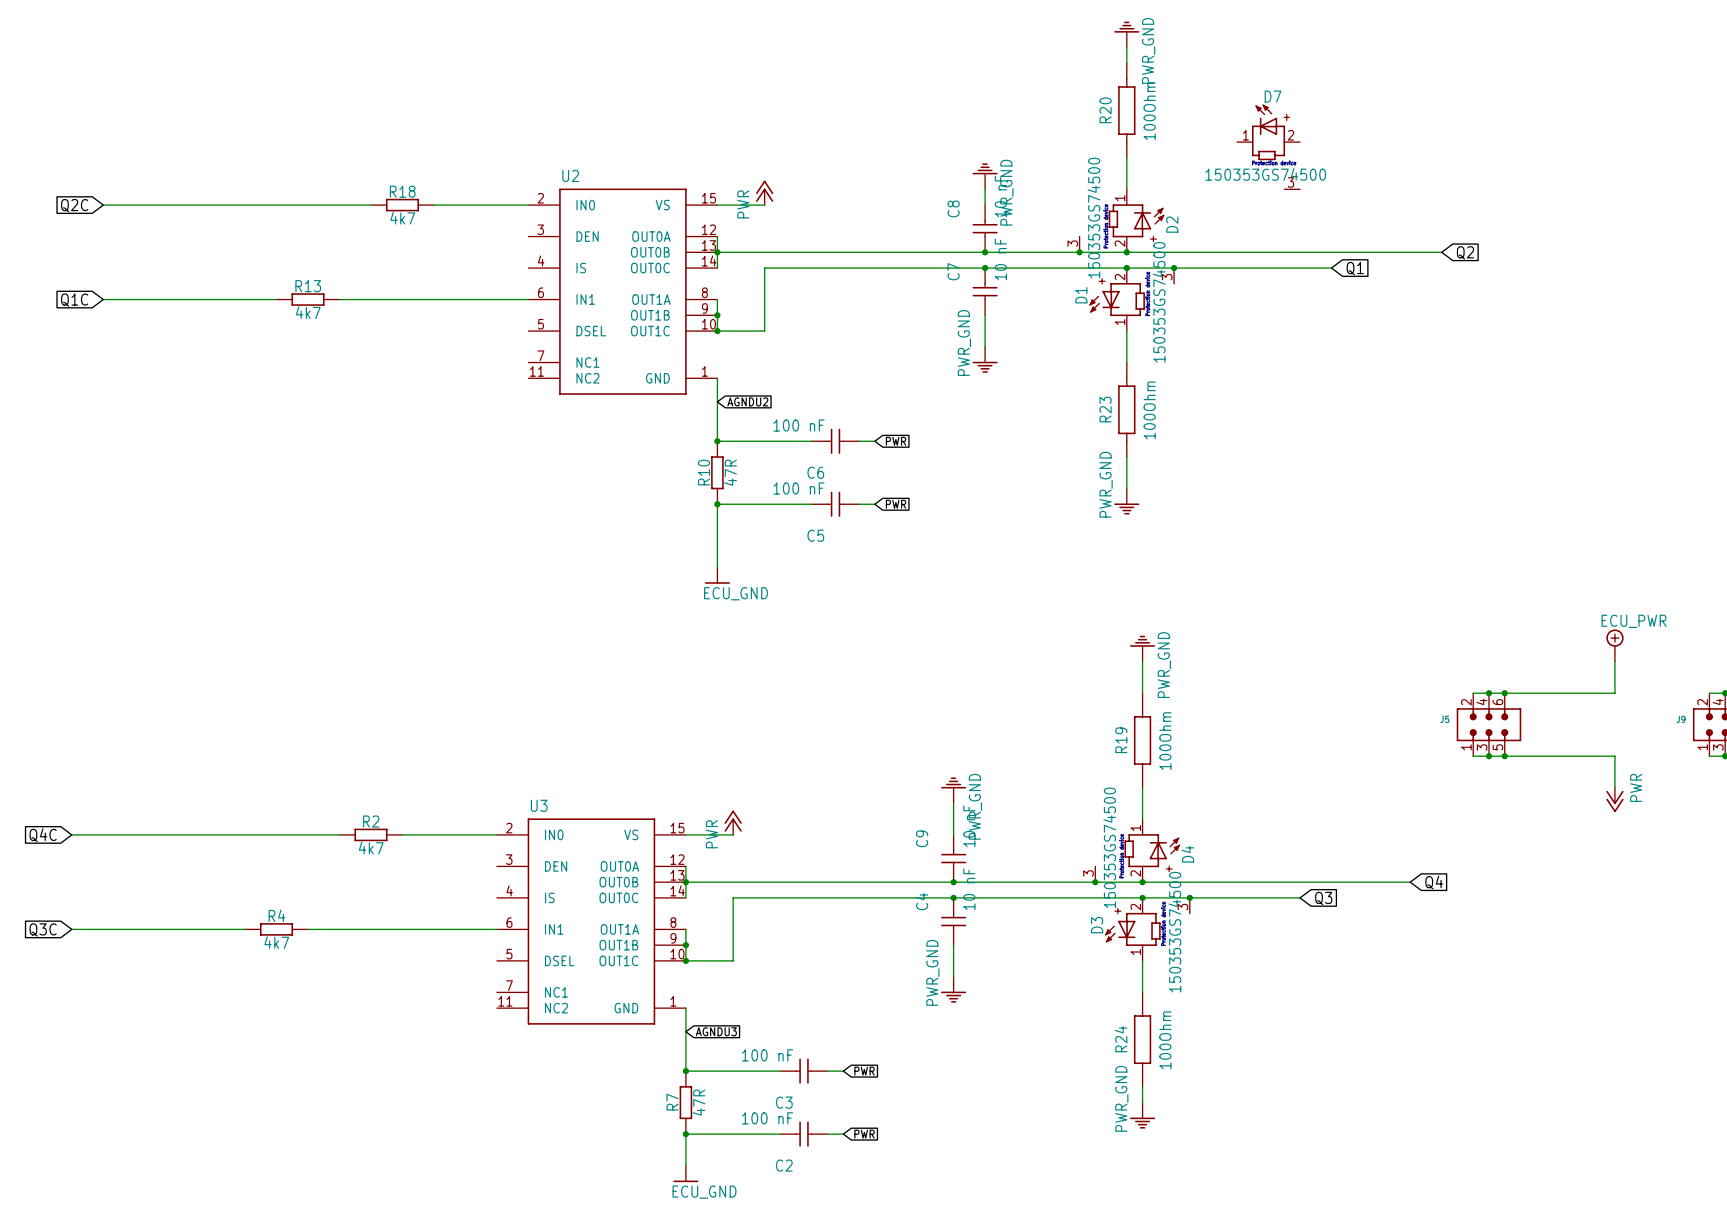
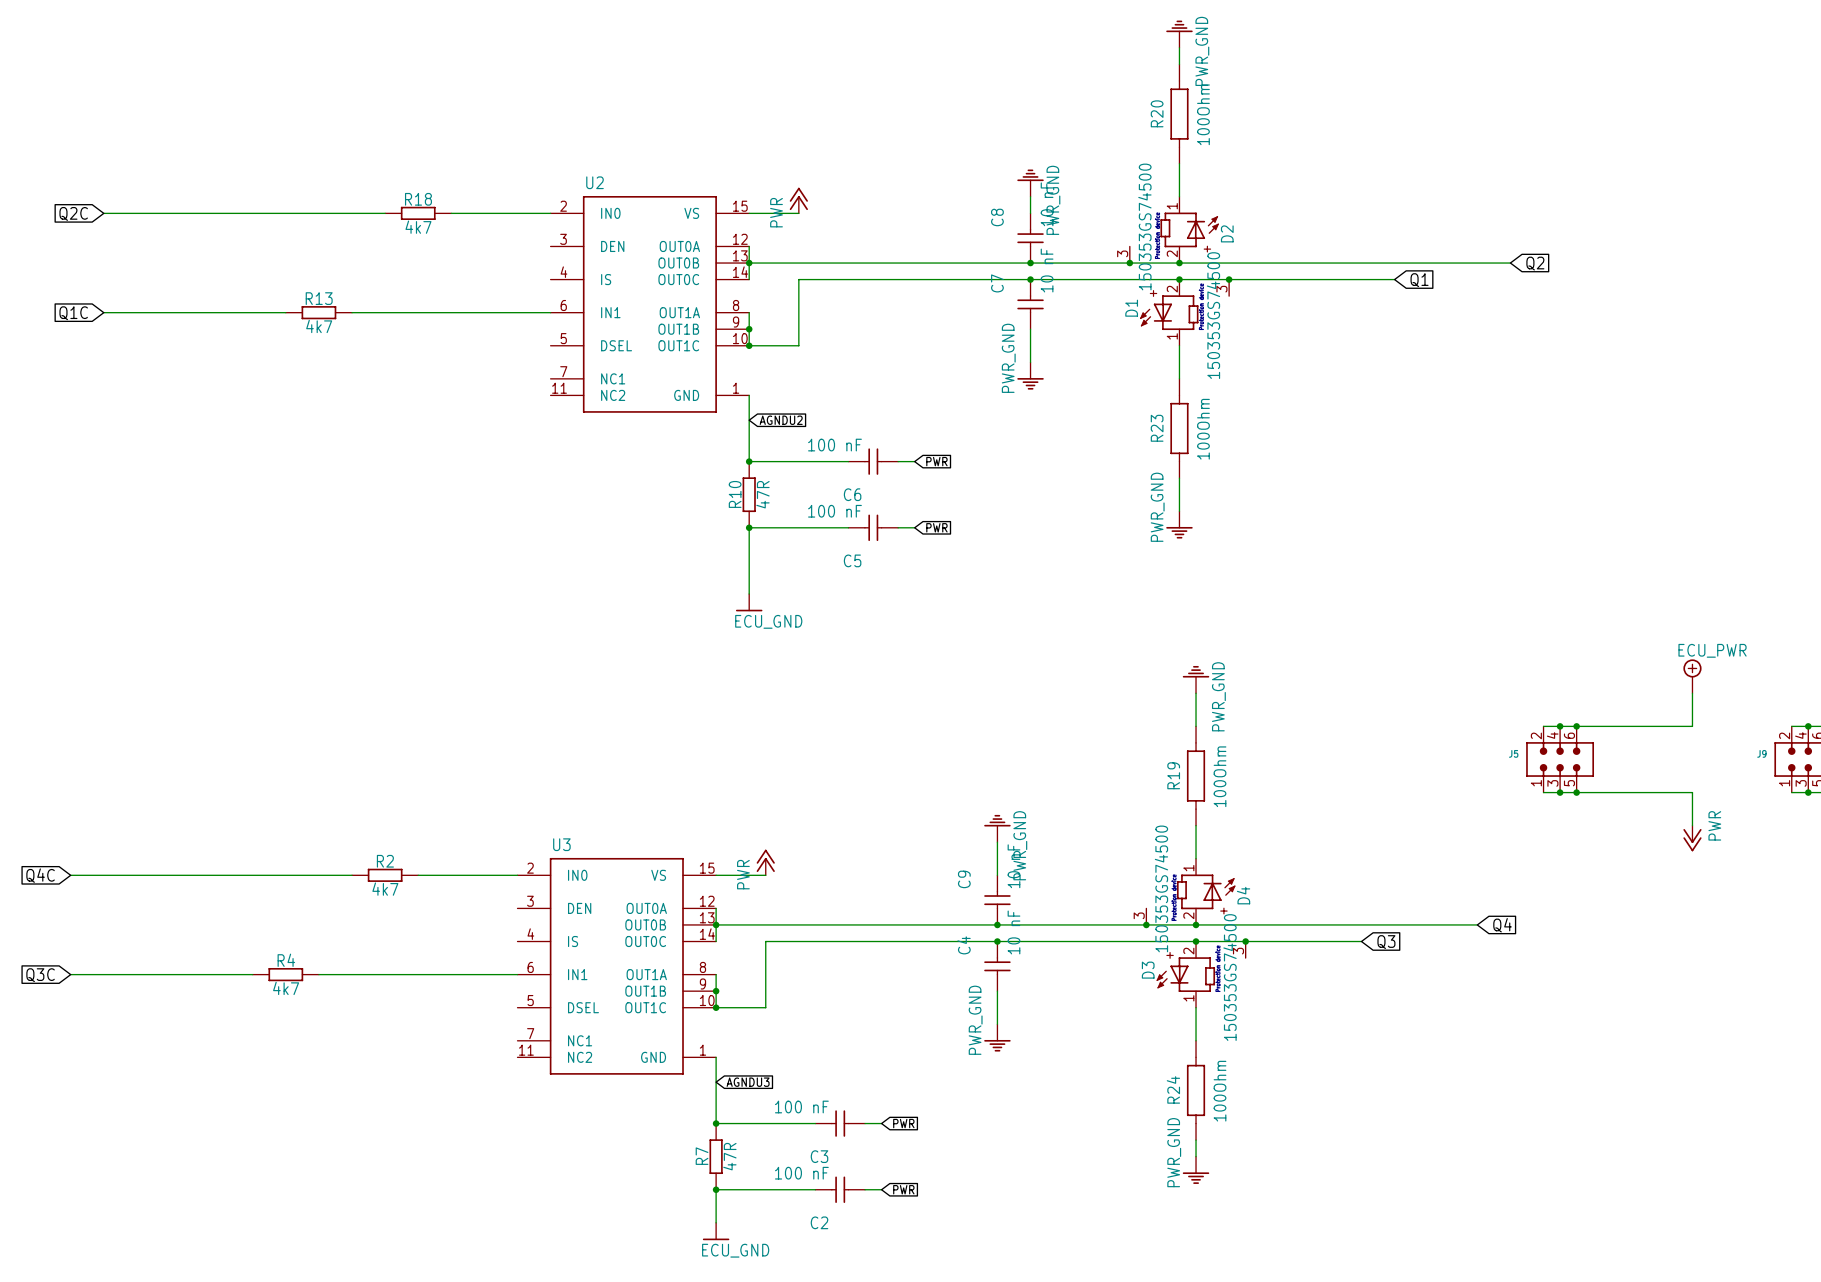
D7: 150353GS74500 (1268, 146) -> none

